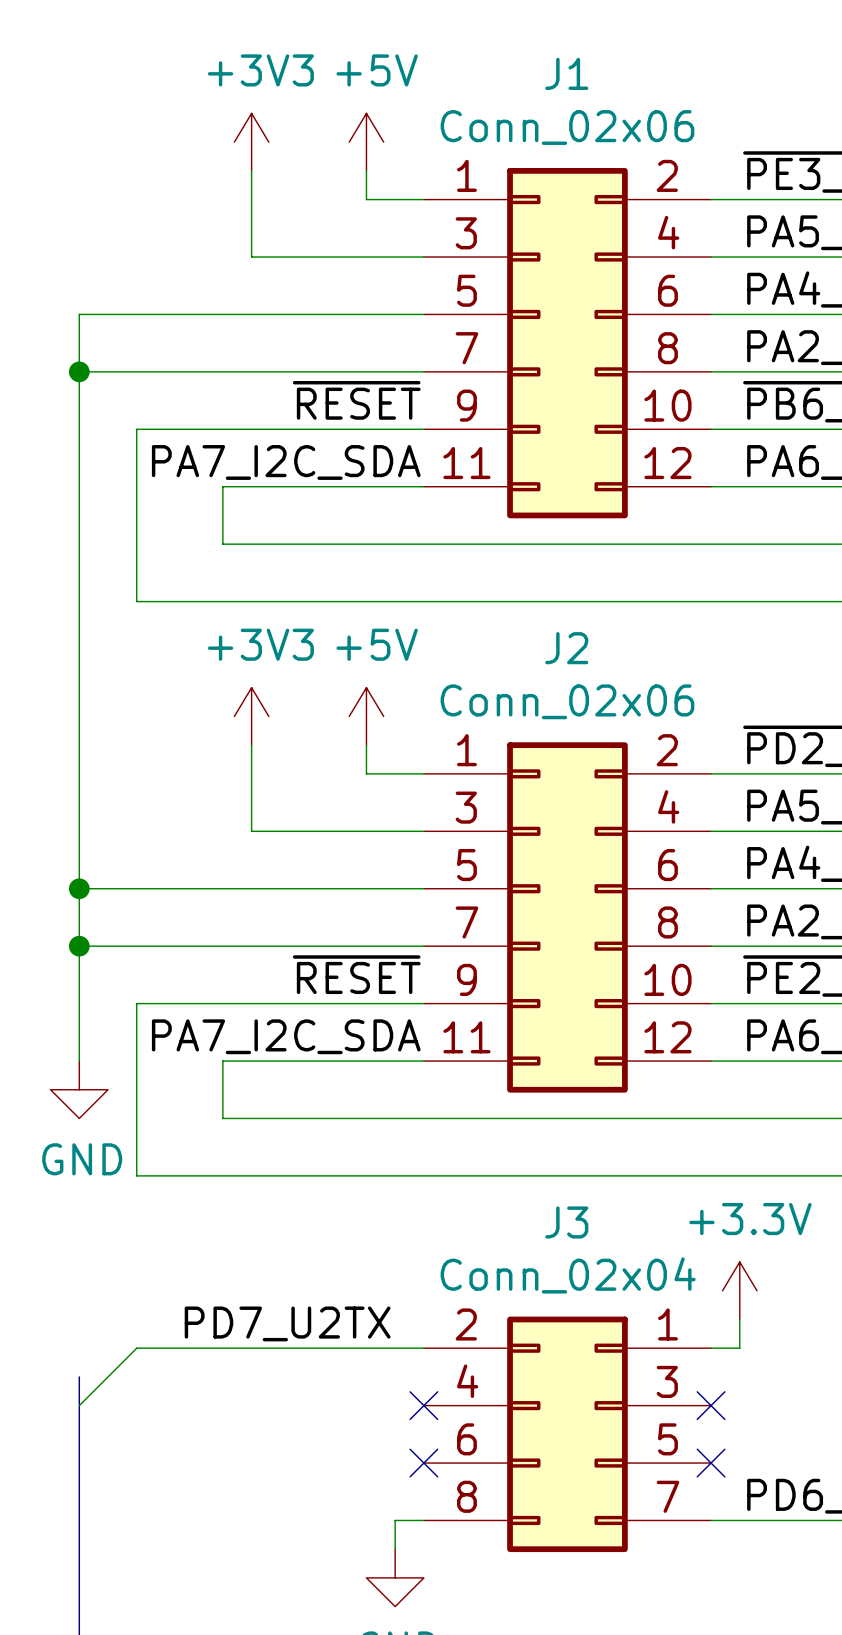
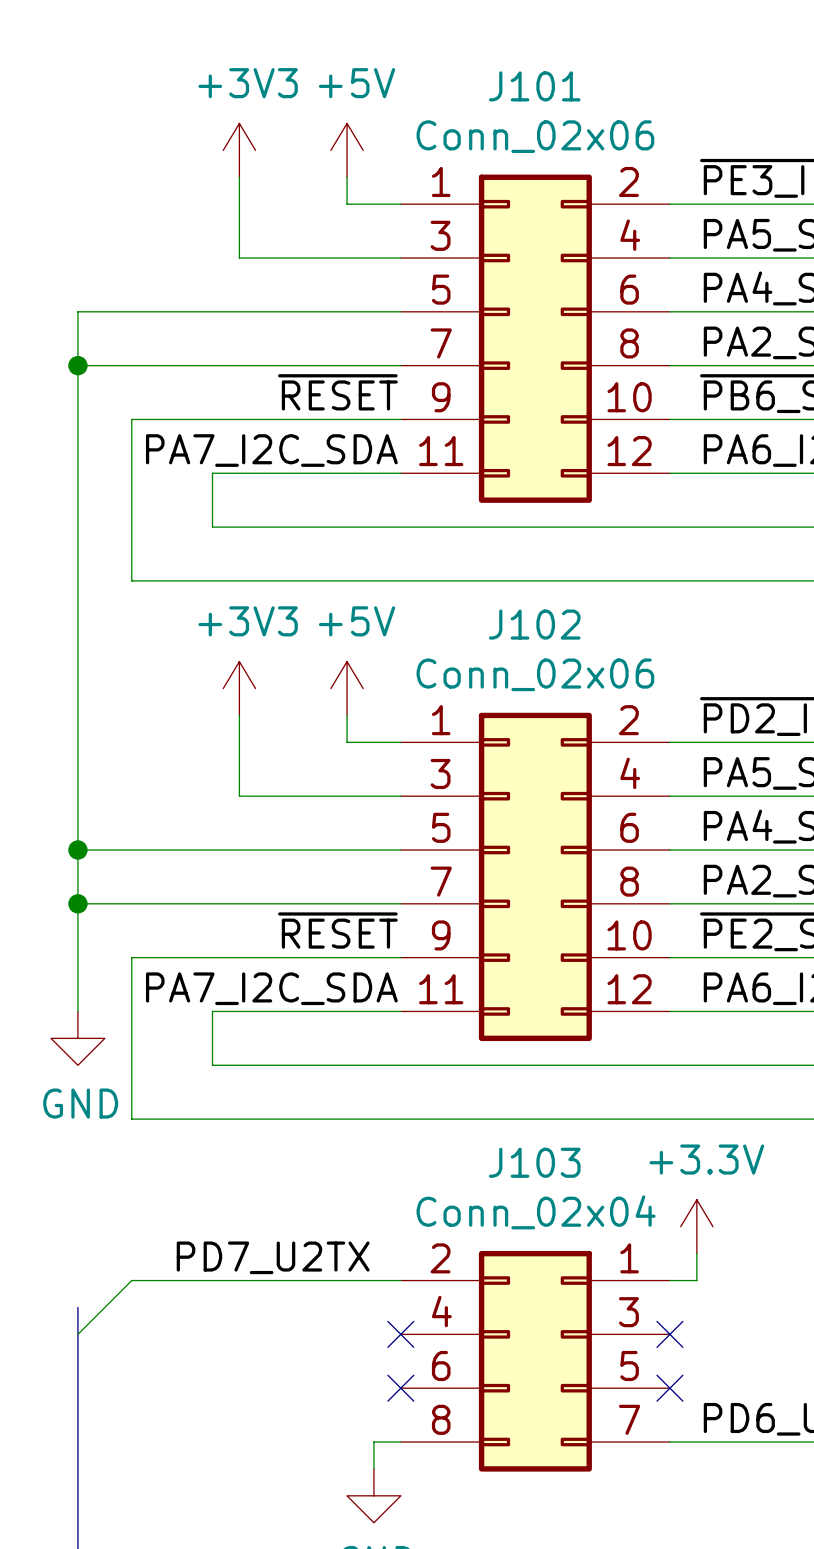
J1 name: J1 (566, 73) -> J101 (534, 86)
J2 name: J2 (566, 648) -> J102 (534, 624)
J3 name: J3 (566, 1222) -> J103 (534, 1162)

